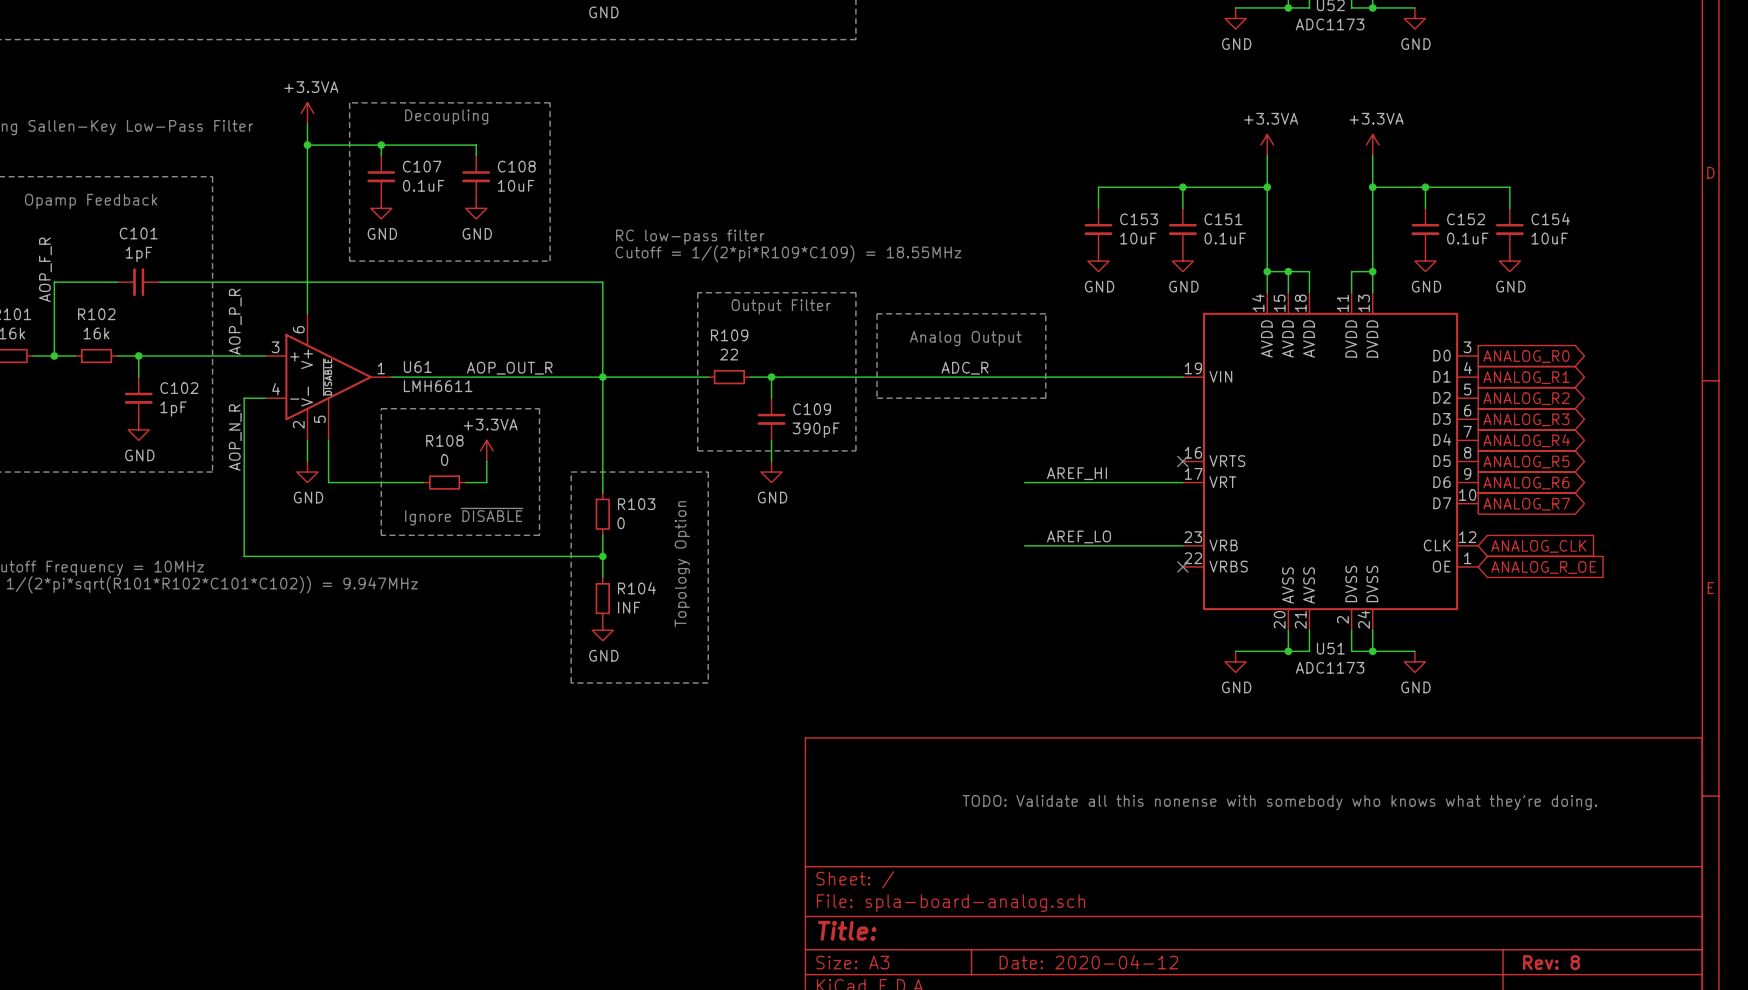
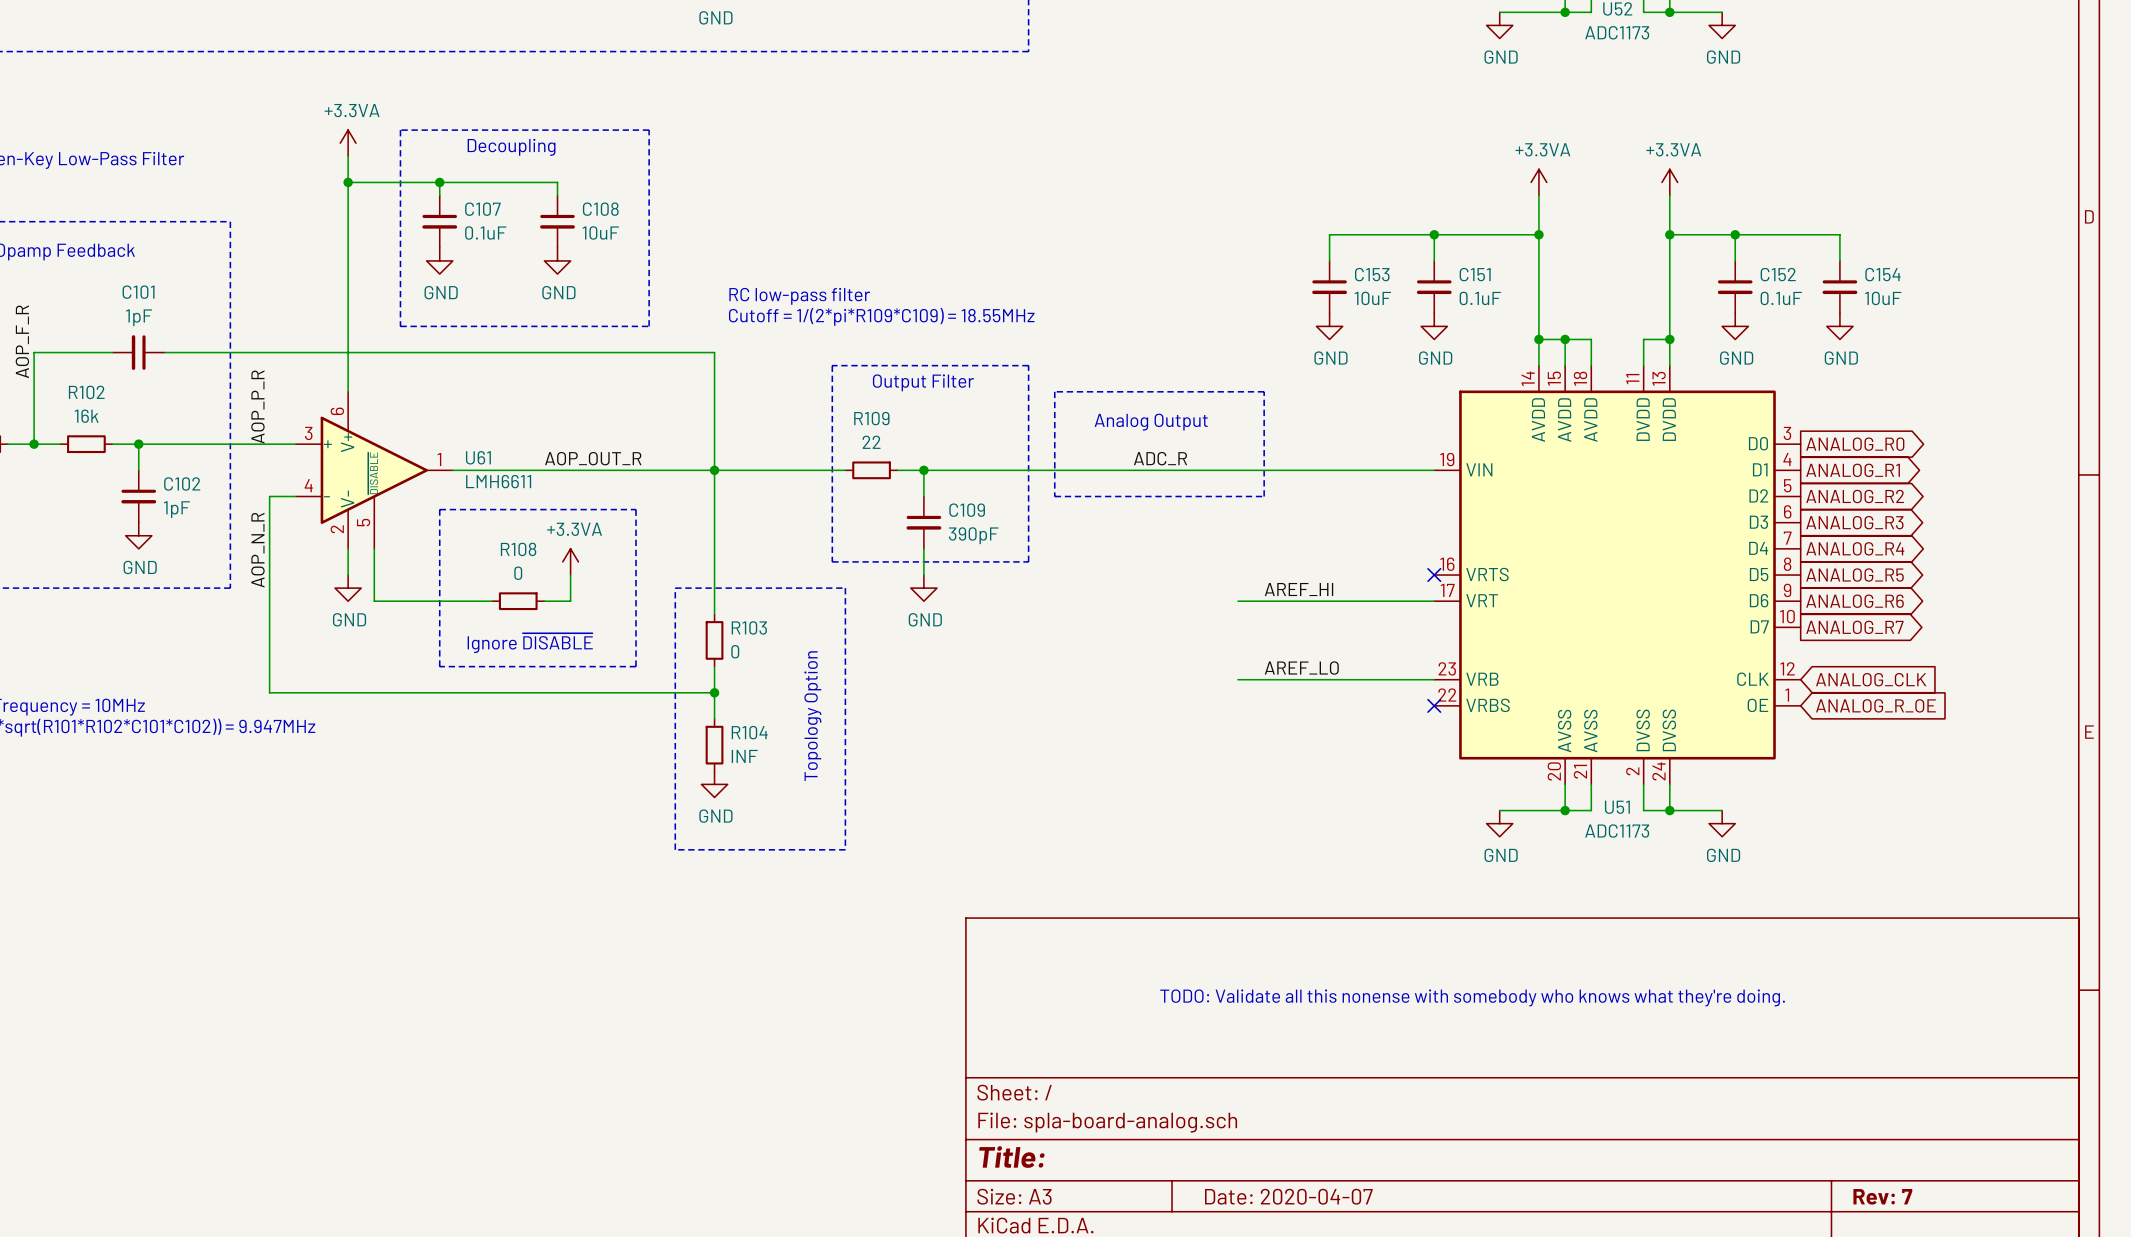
title block: Date: 2020-04-12 (1088, 962) -> Date: 2020-04-07 (1288, 1196)
title block: Rev: 8 (1551, 962) -> Rev: 7 (1882, 1196)

